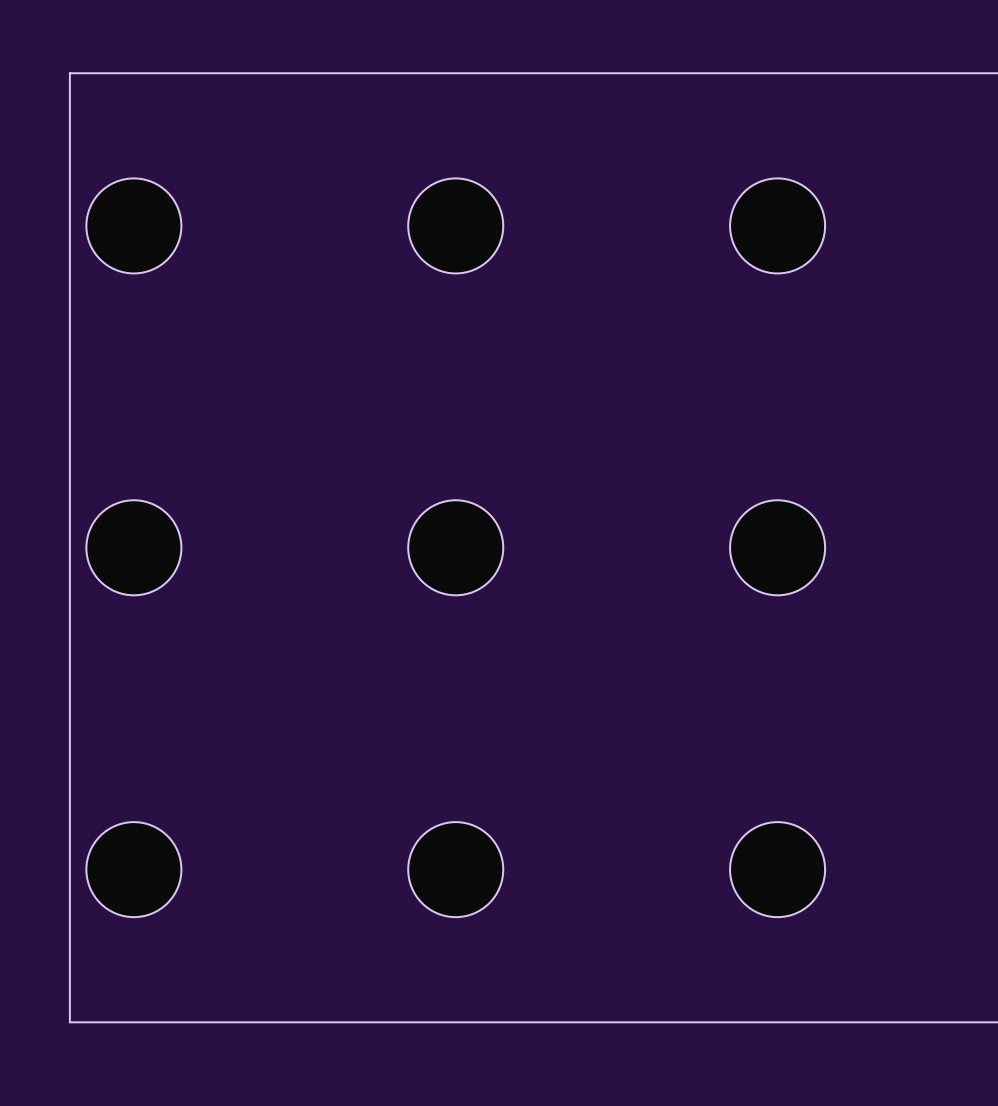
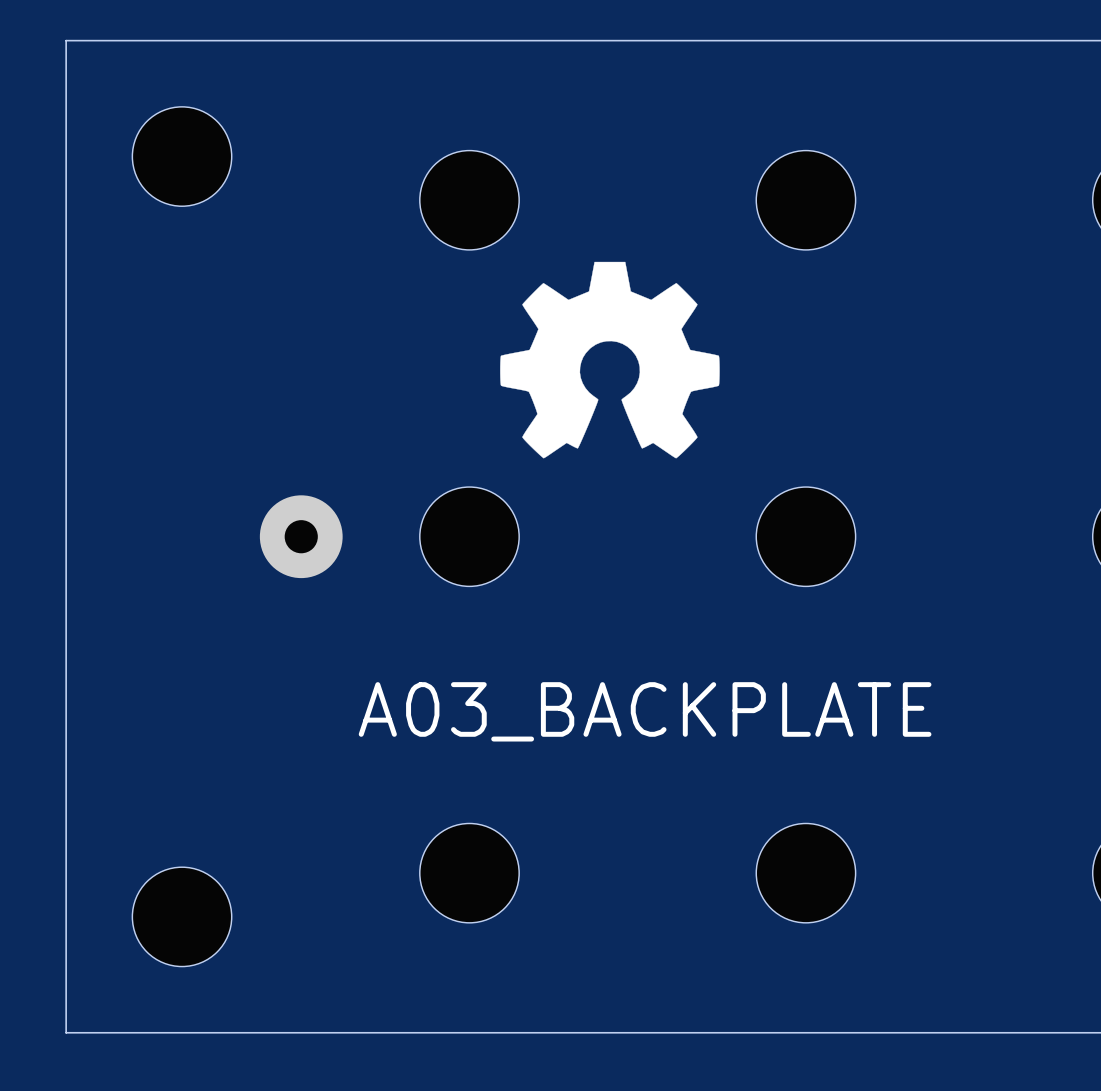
part position: (133, 225) -> (182, 156)
drawing: none -> [500, 261, 720, 459]
part: (133, 547) -> none
part: none -> (301, 536)
text: none -> A03_BACKPLATE (645, 711)
part position: (133, 869) -> (182, 916)

